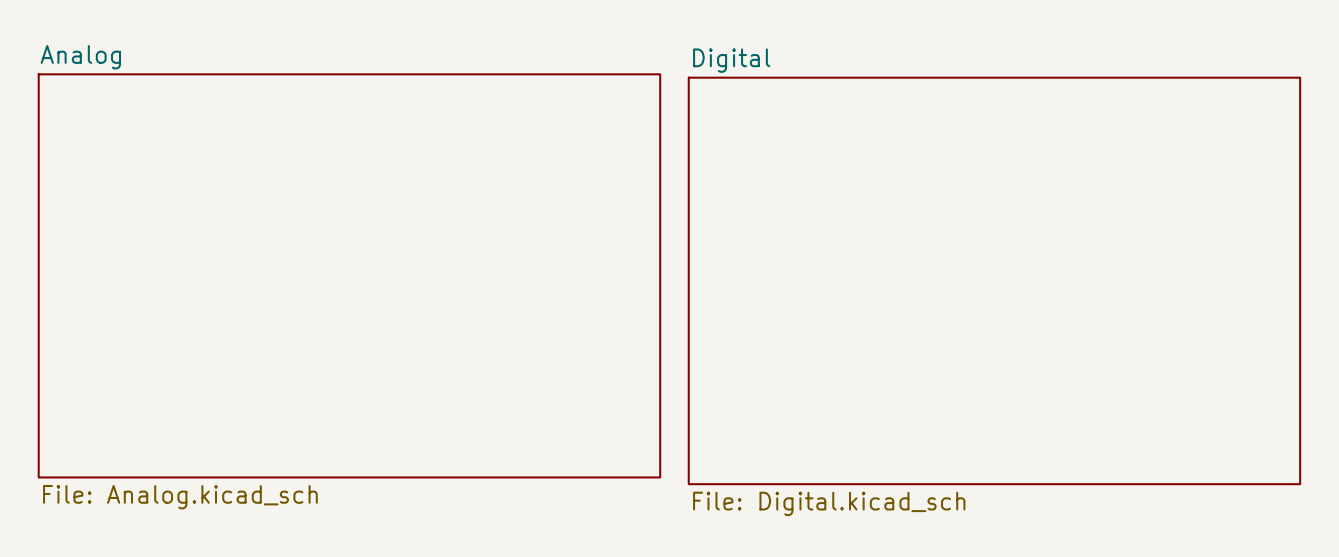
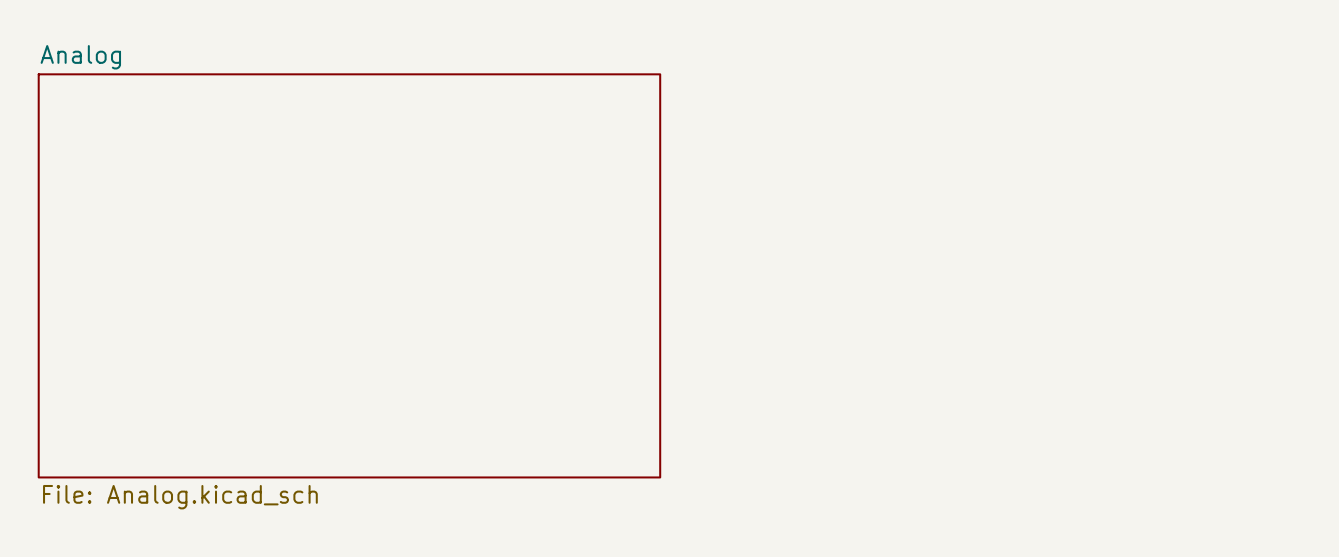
sheet Digital: File: Digital.kicad_sch (994, 280) -> none

